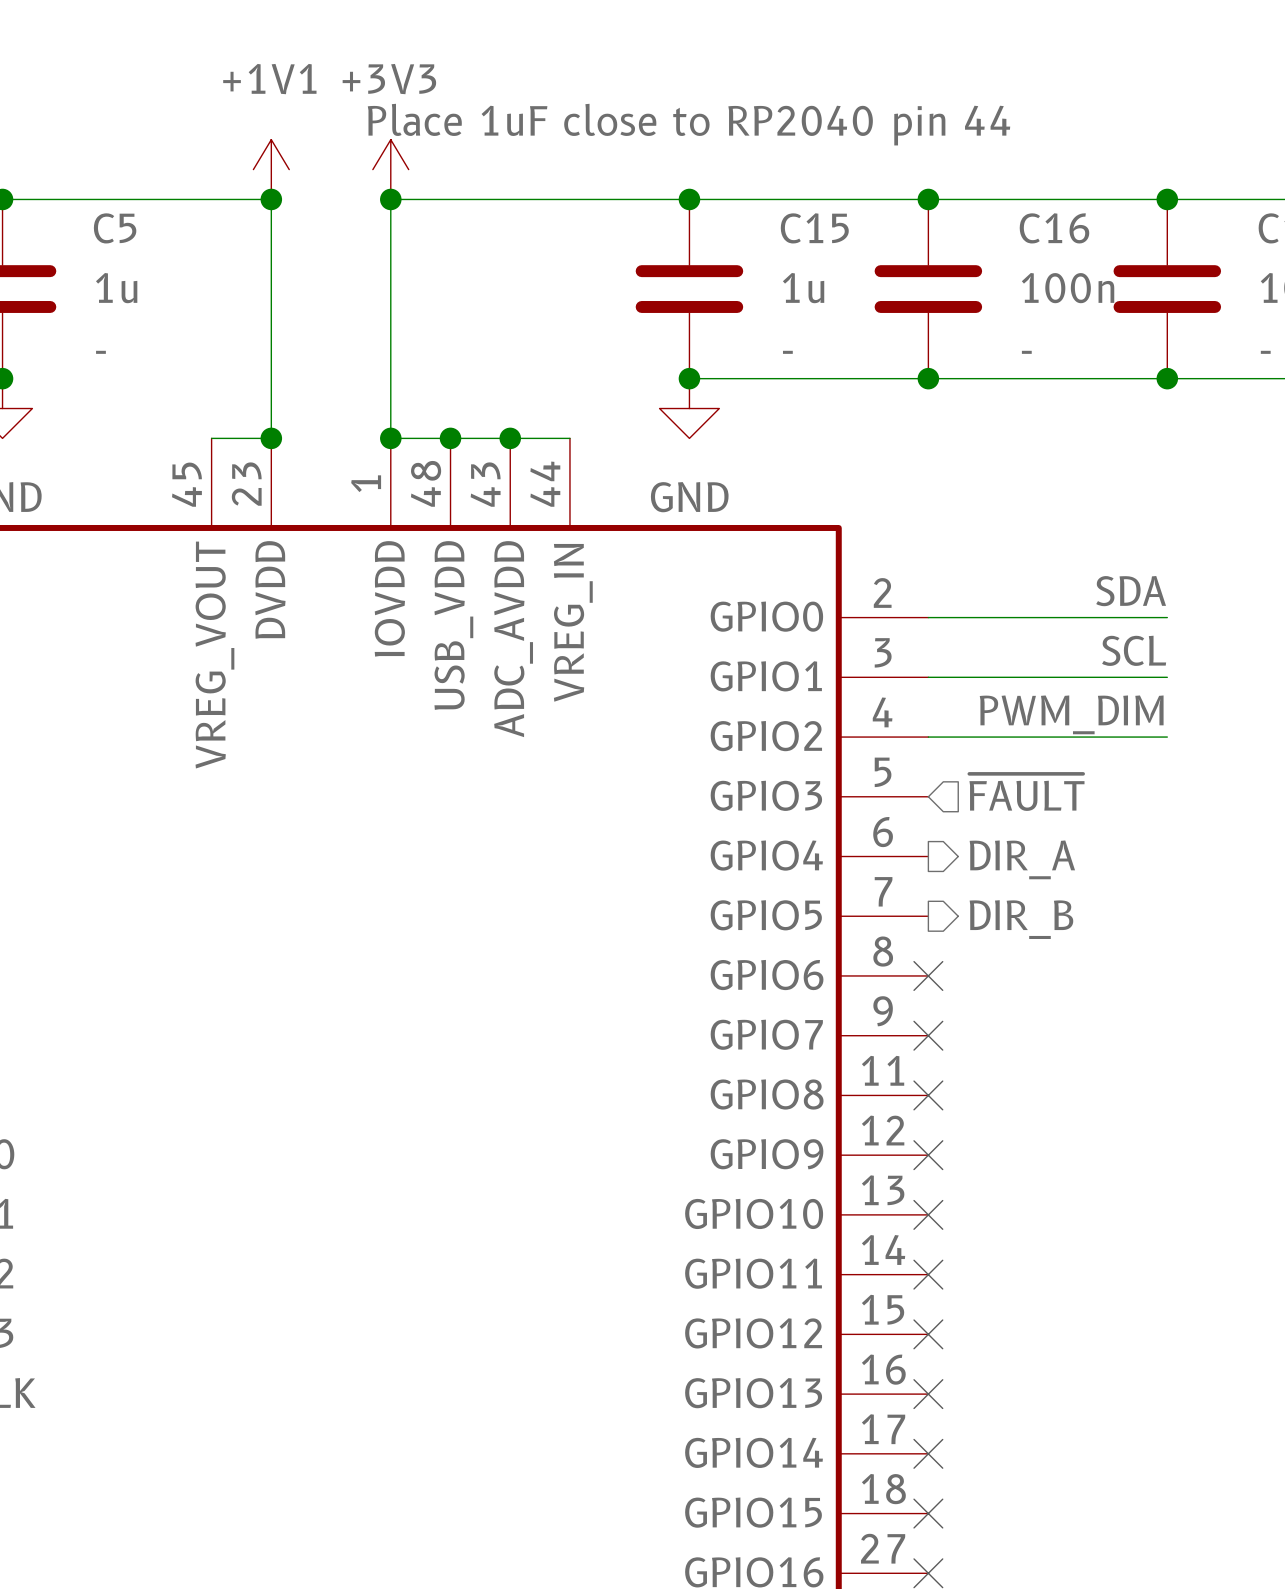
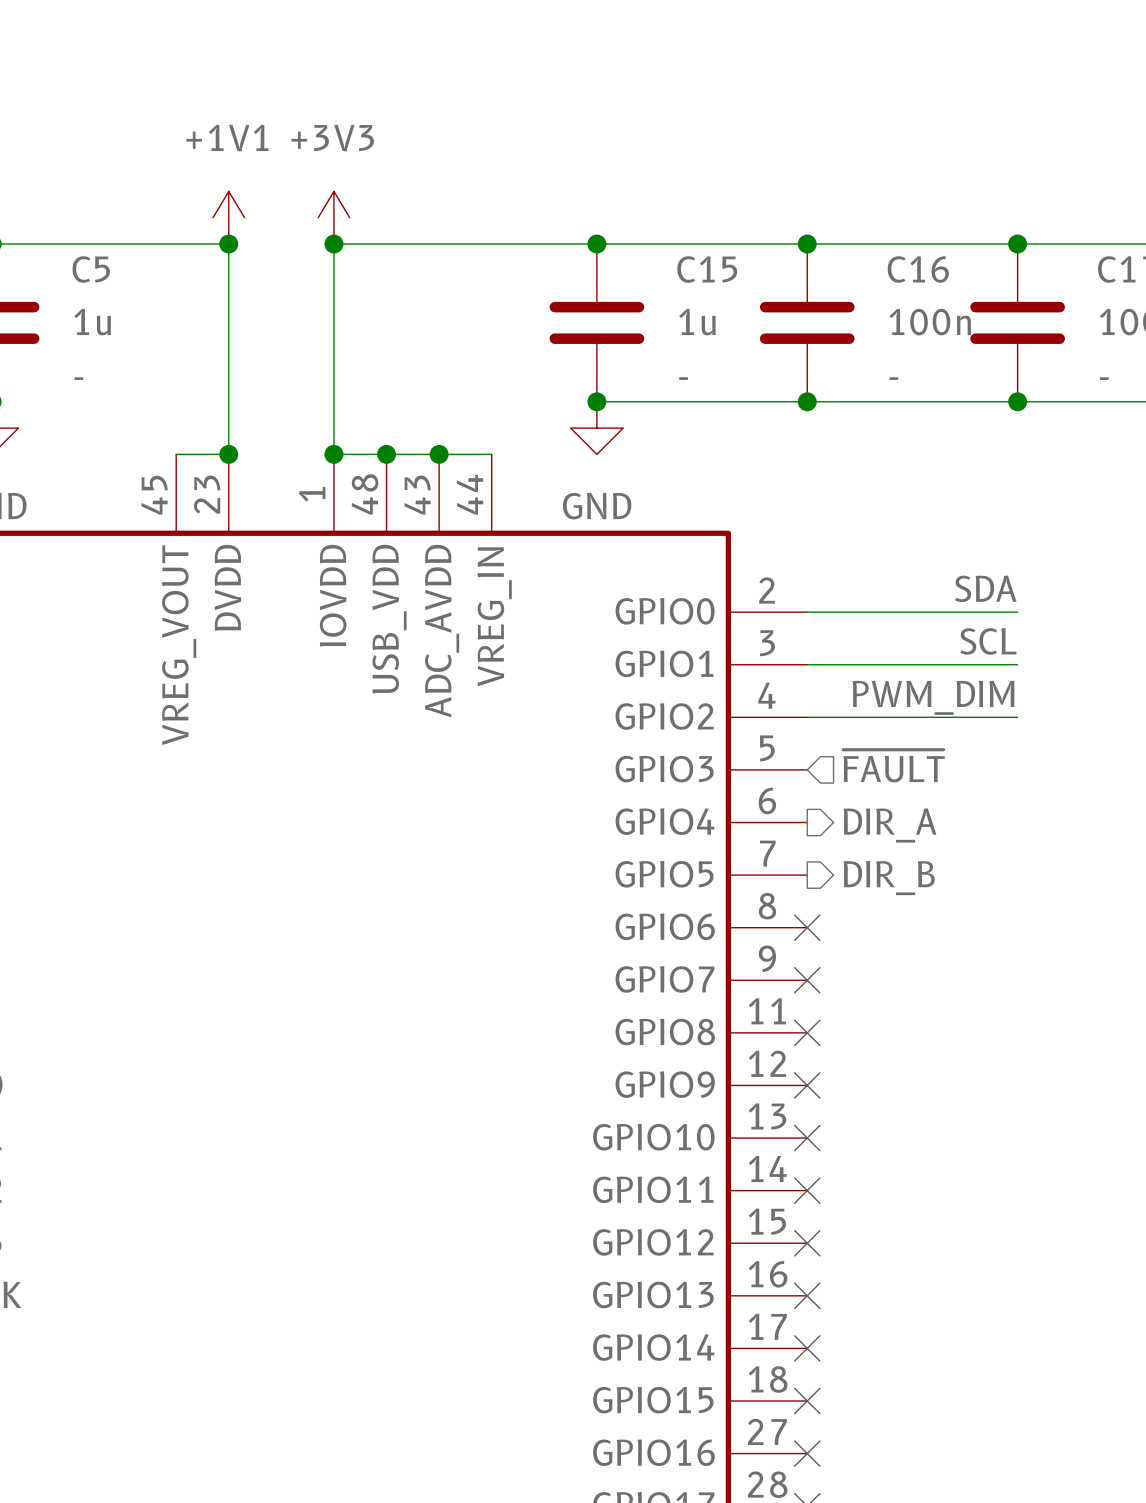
C15 text: Place 1uF close to RP2040 pin 44 (689, 124) -> none

